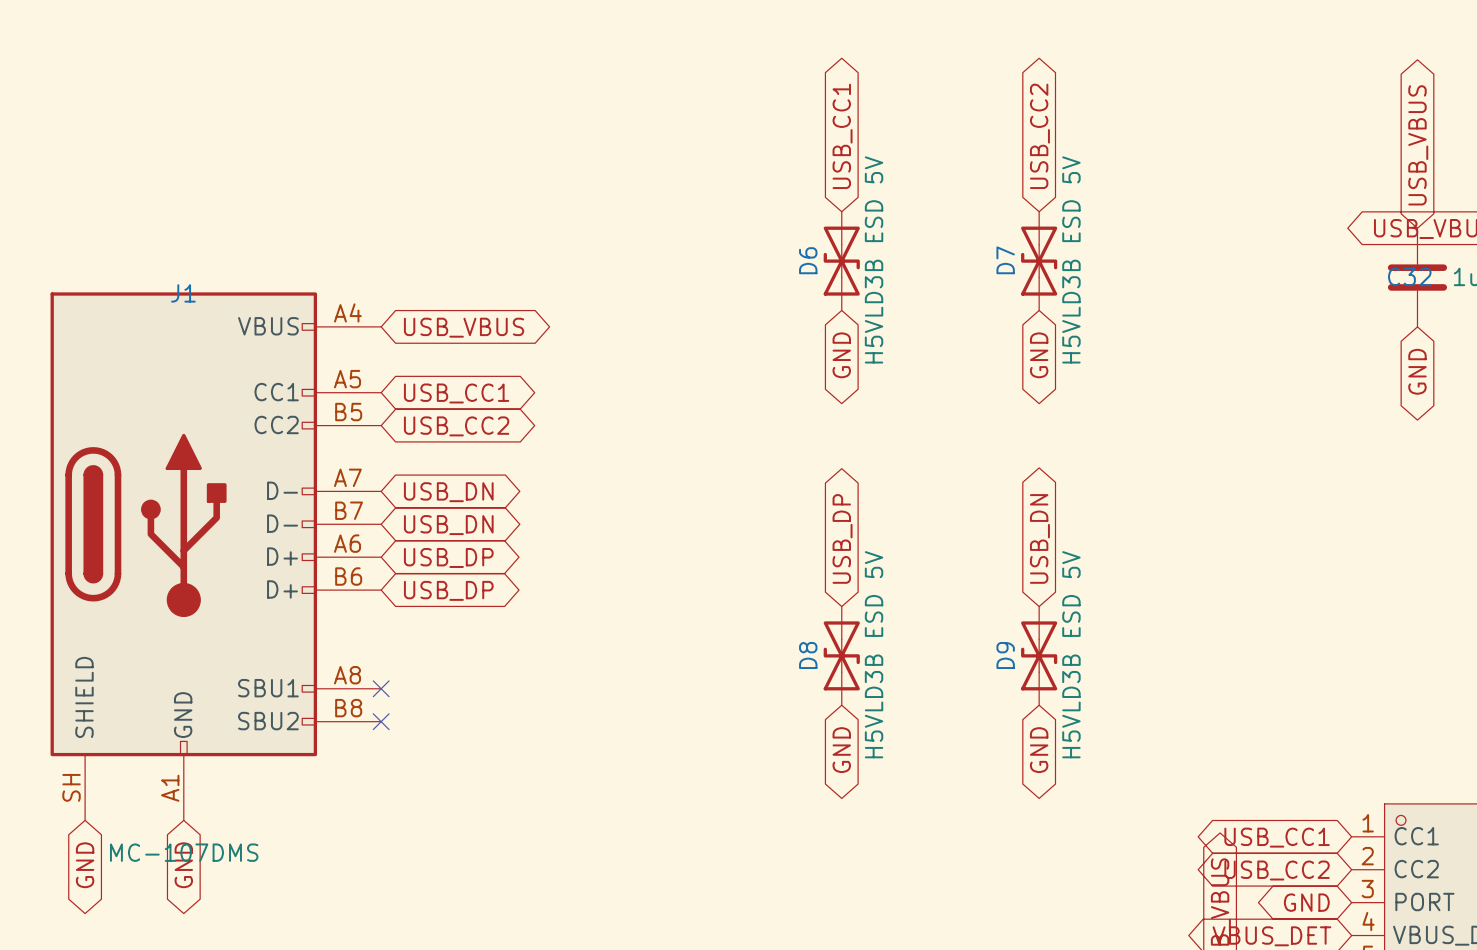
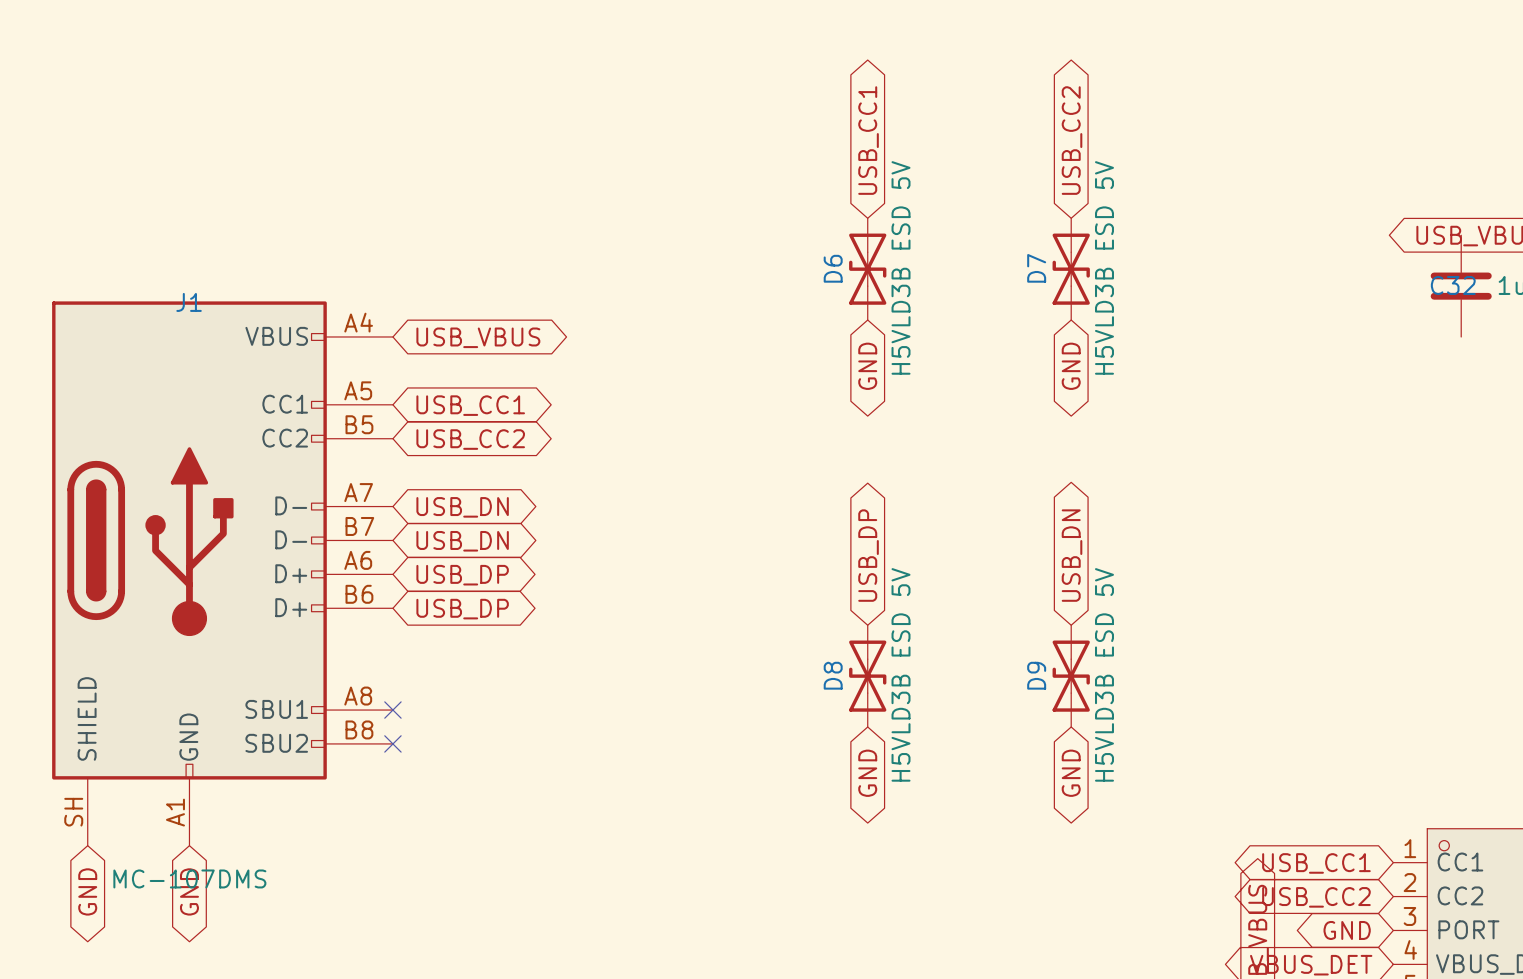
global label: USB_VBUS (1418, 145) -> none
global label: GND (1417, 371) -> none

